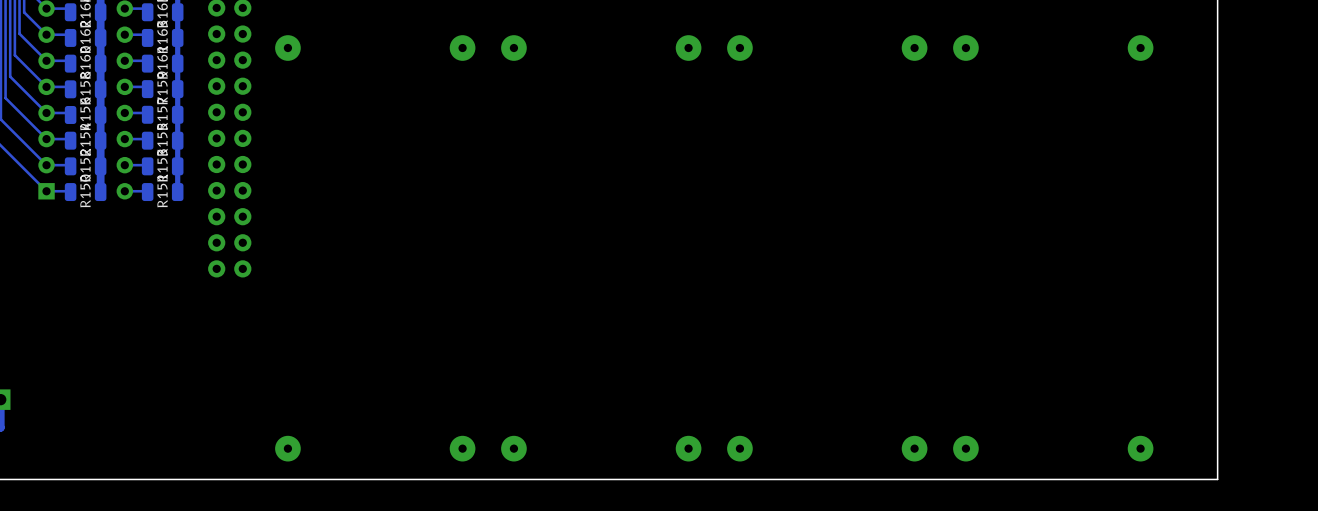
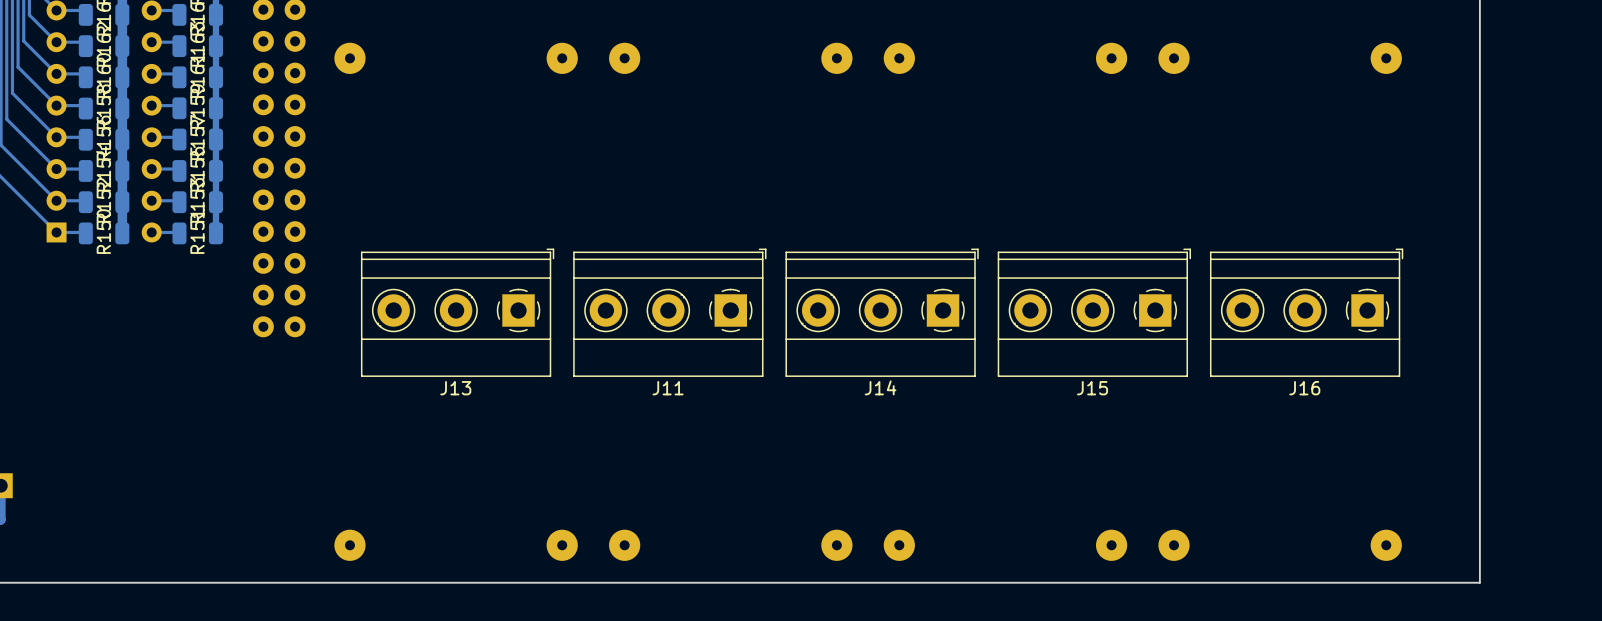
J13: none -> (457, 312)
J11: none -> (669, 312)
J14: none -> (882, 312)
J15: none -> (1094, 312)
J16: none -> (1306, 312)

